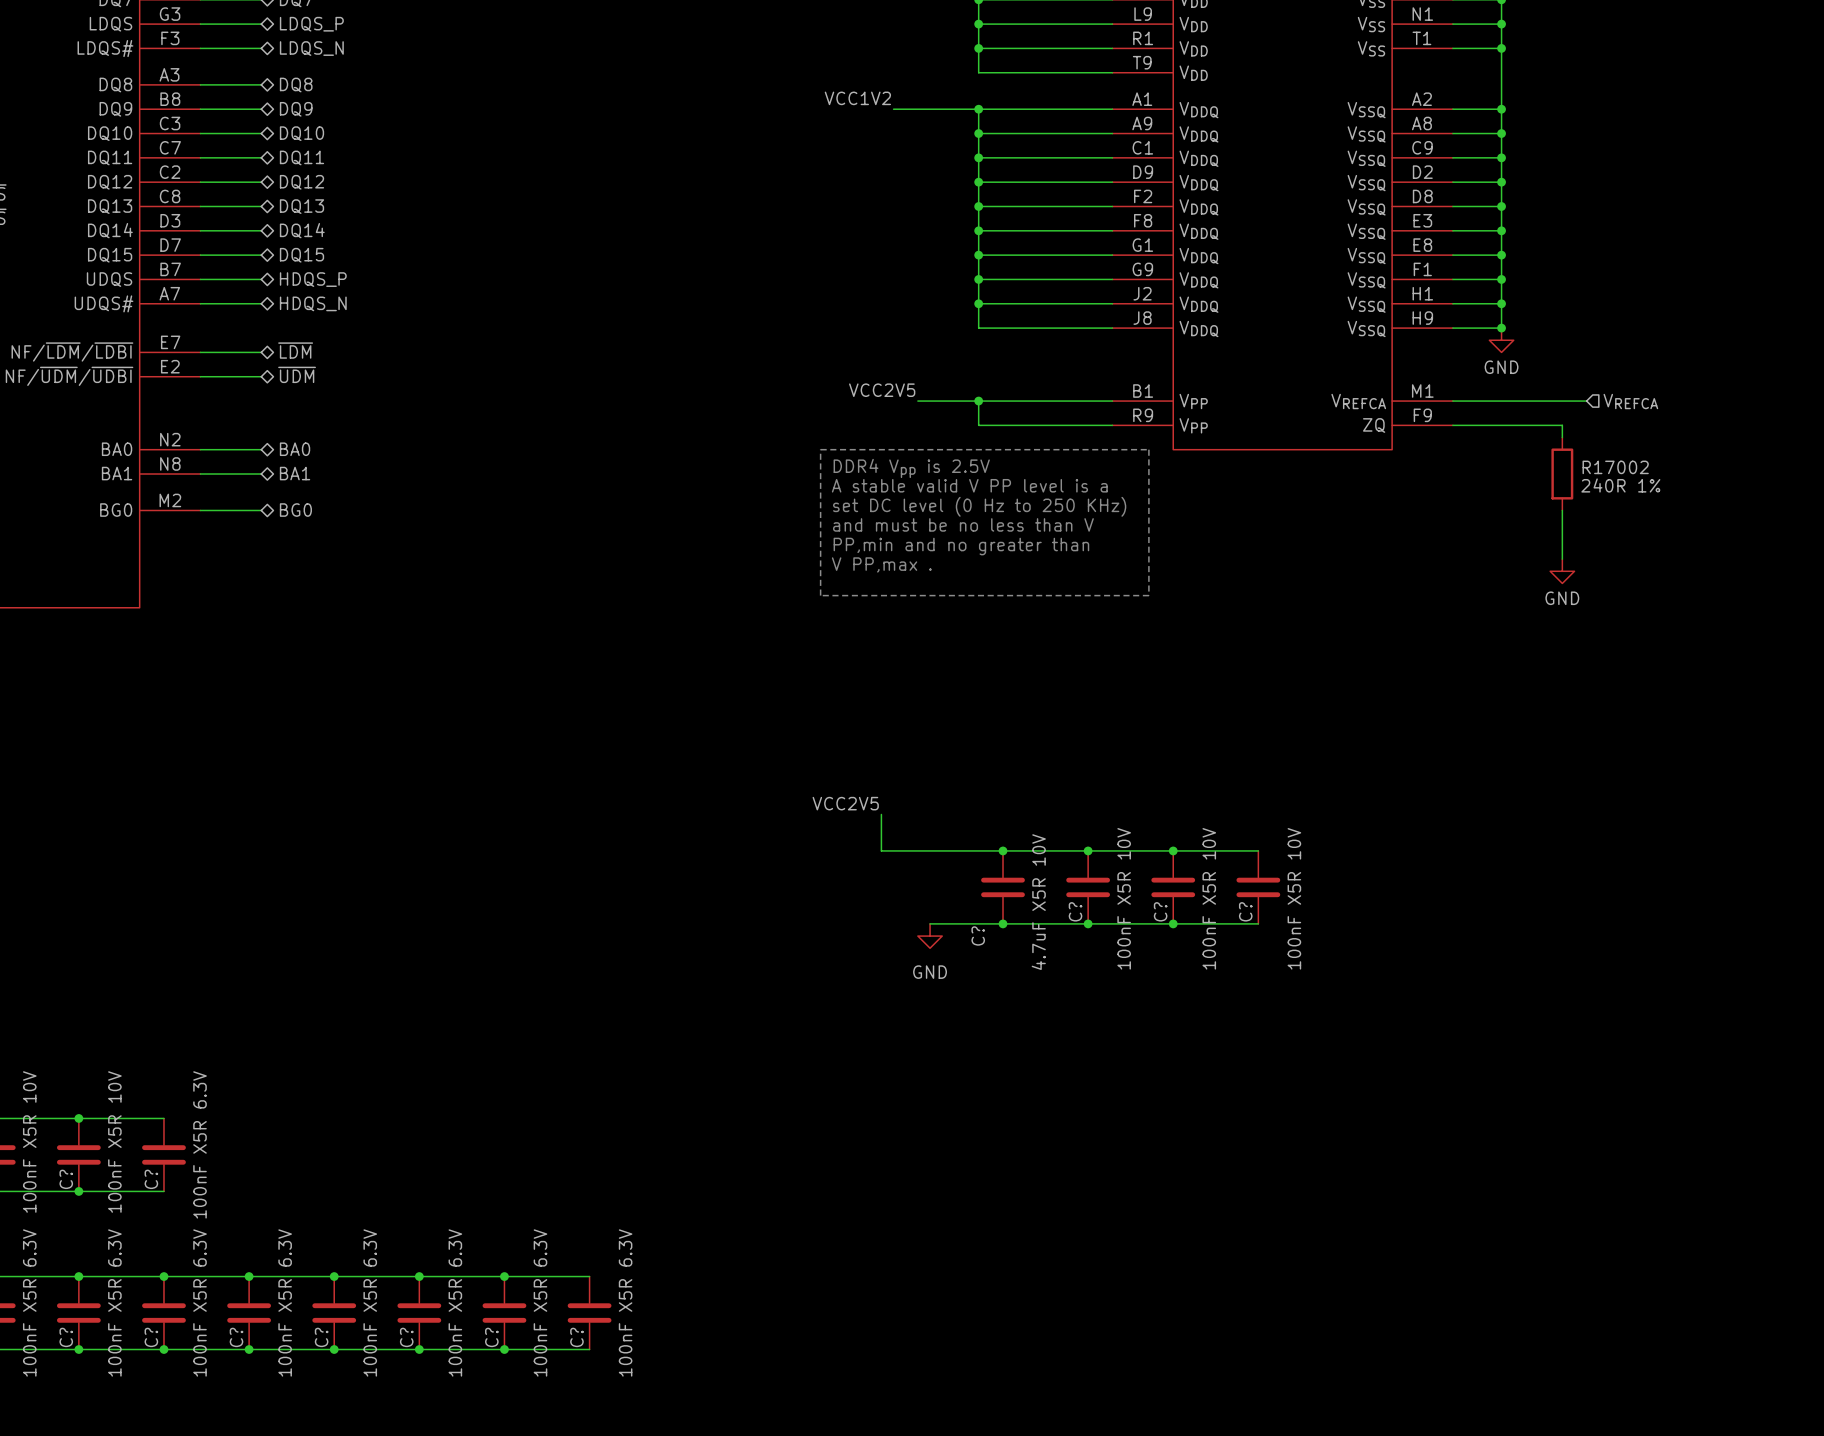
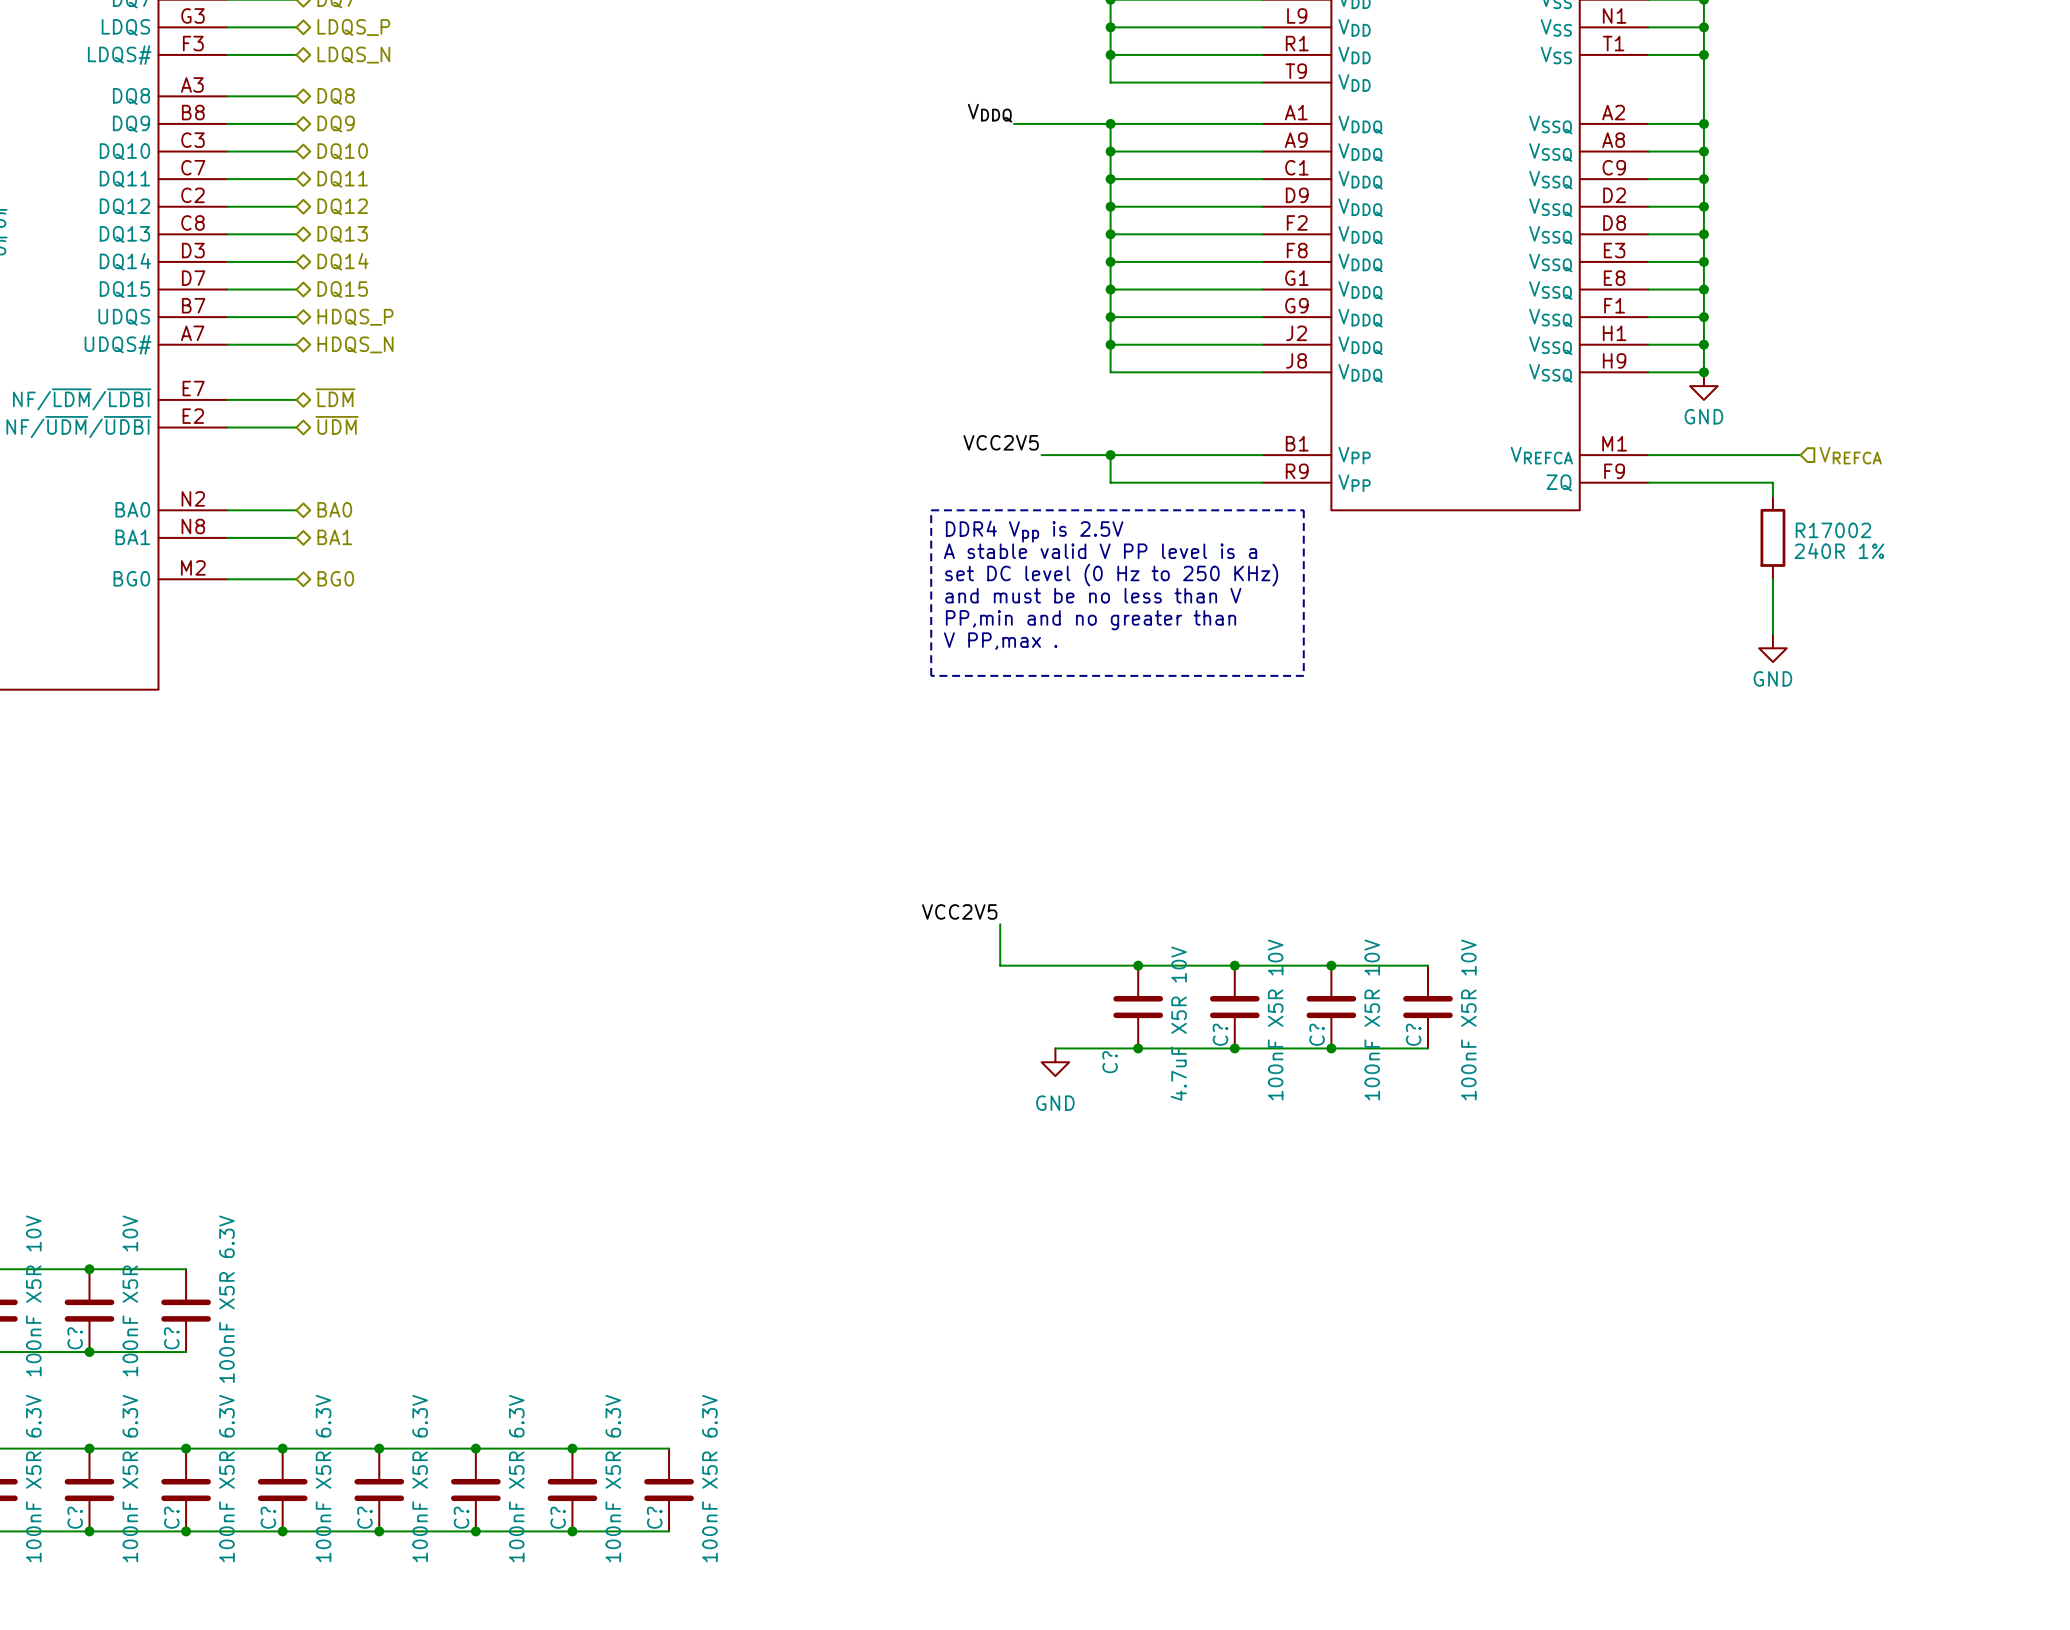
label: VCC1V2 (857, 98) -> VDDQ (990, 113)

